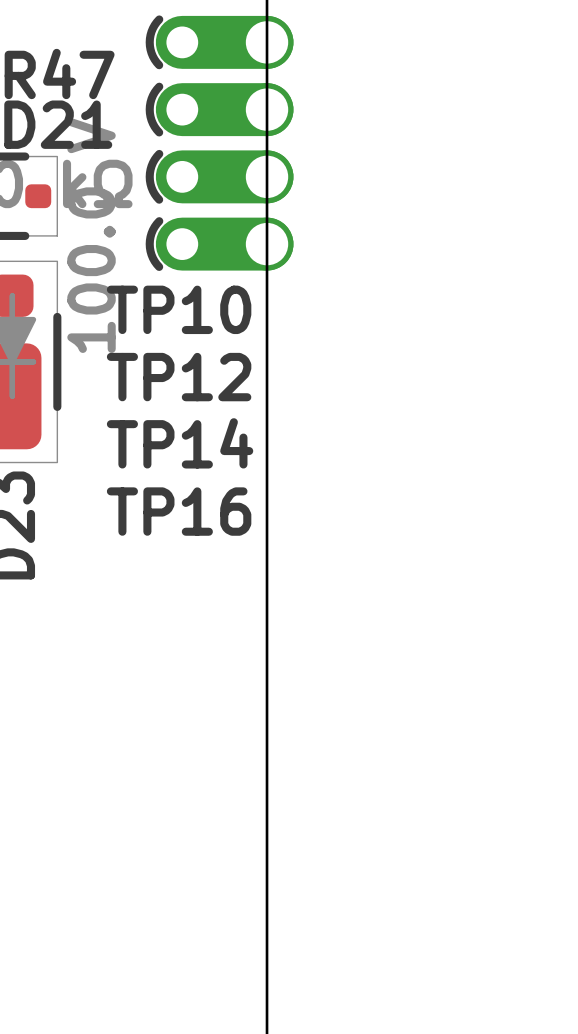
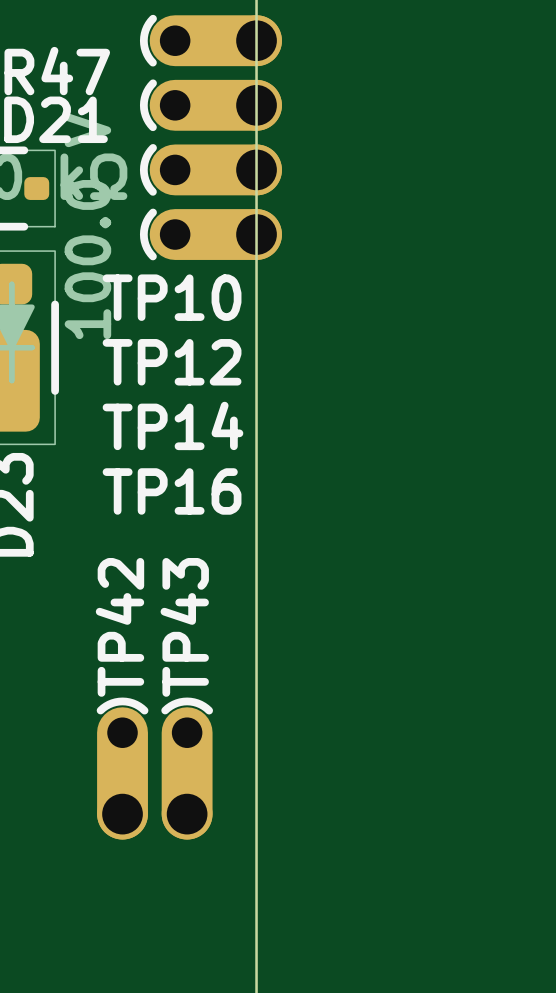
TP42: none -> (122, 768)
TP43: none -> (187, 768)

